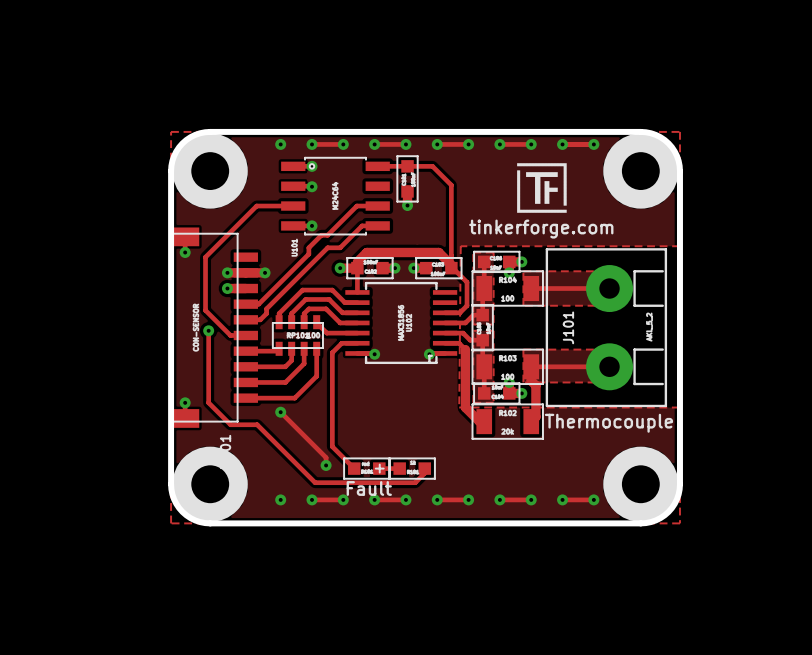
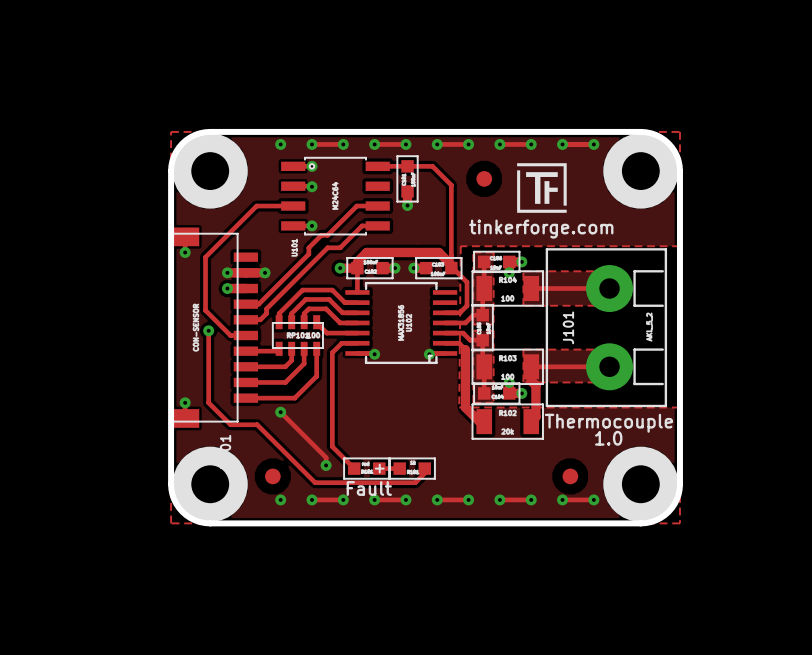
part: none -> (484, 178)
text: none -> 1.0 (608, 438)
part: none -> (272, 476)
part: none -> (570, 476)

